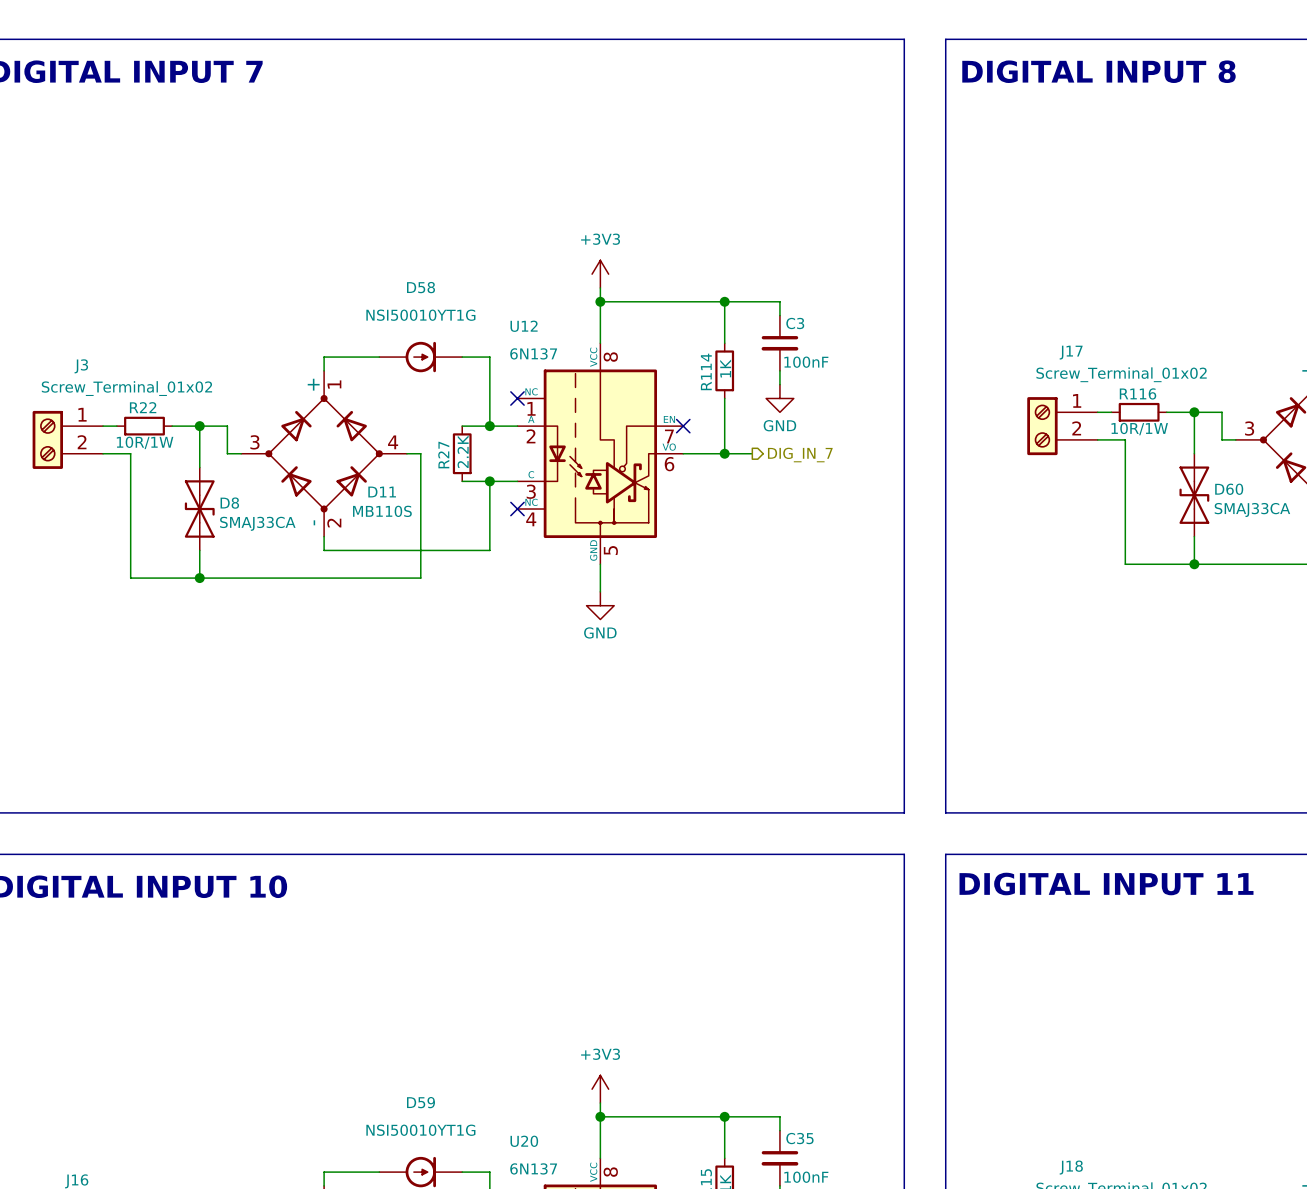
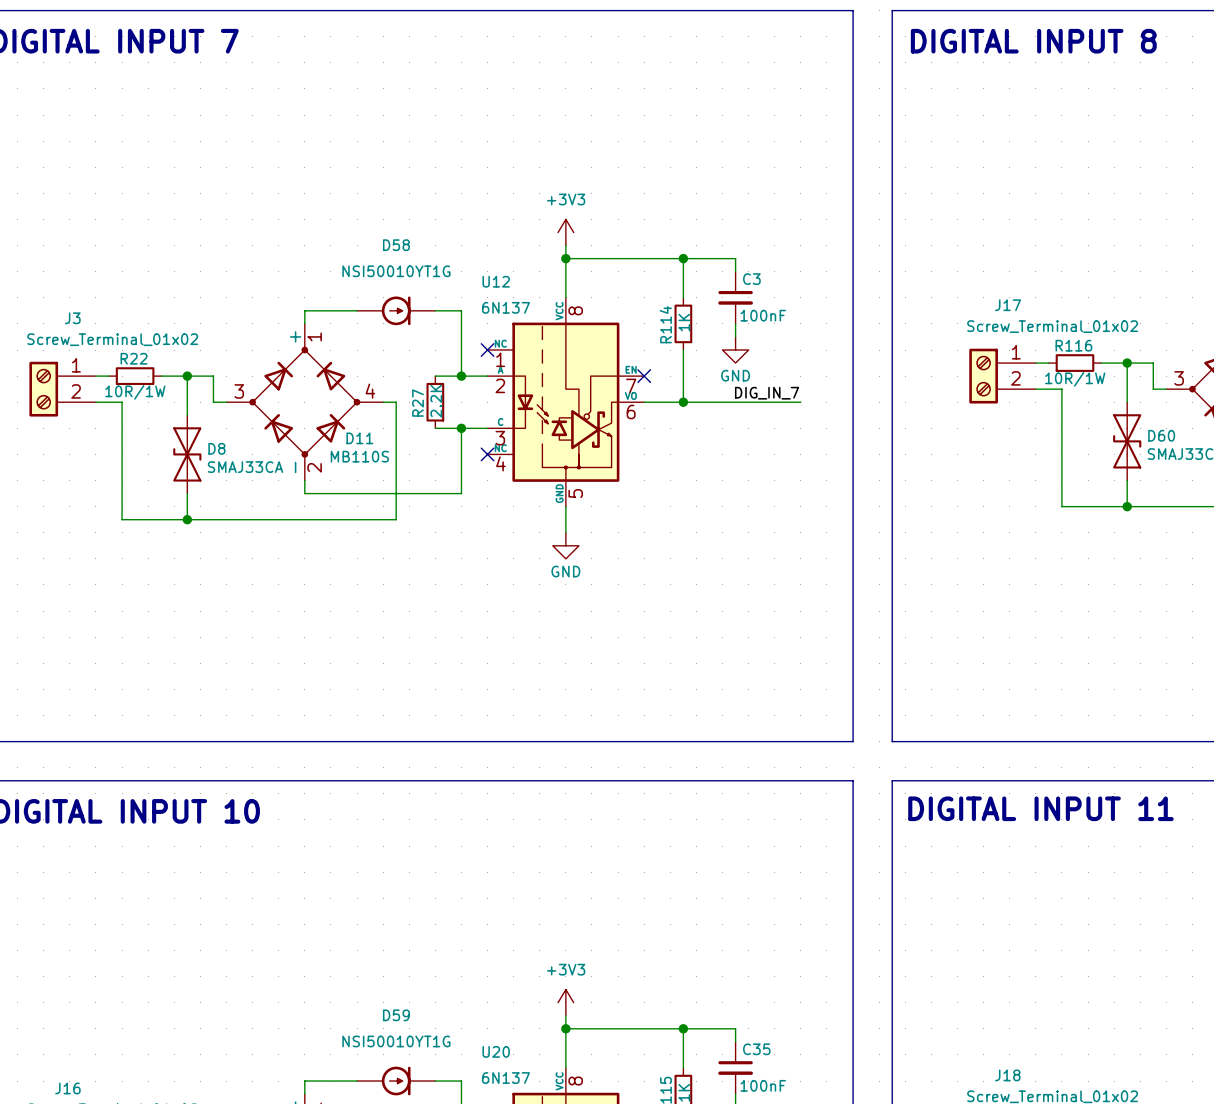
label: none -> DIG_IN_7 (767, 393)
wire: none -> (709, 402) (800, 402)
hierarchical label: DIG_IN_7 (800, 455) -> none

